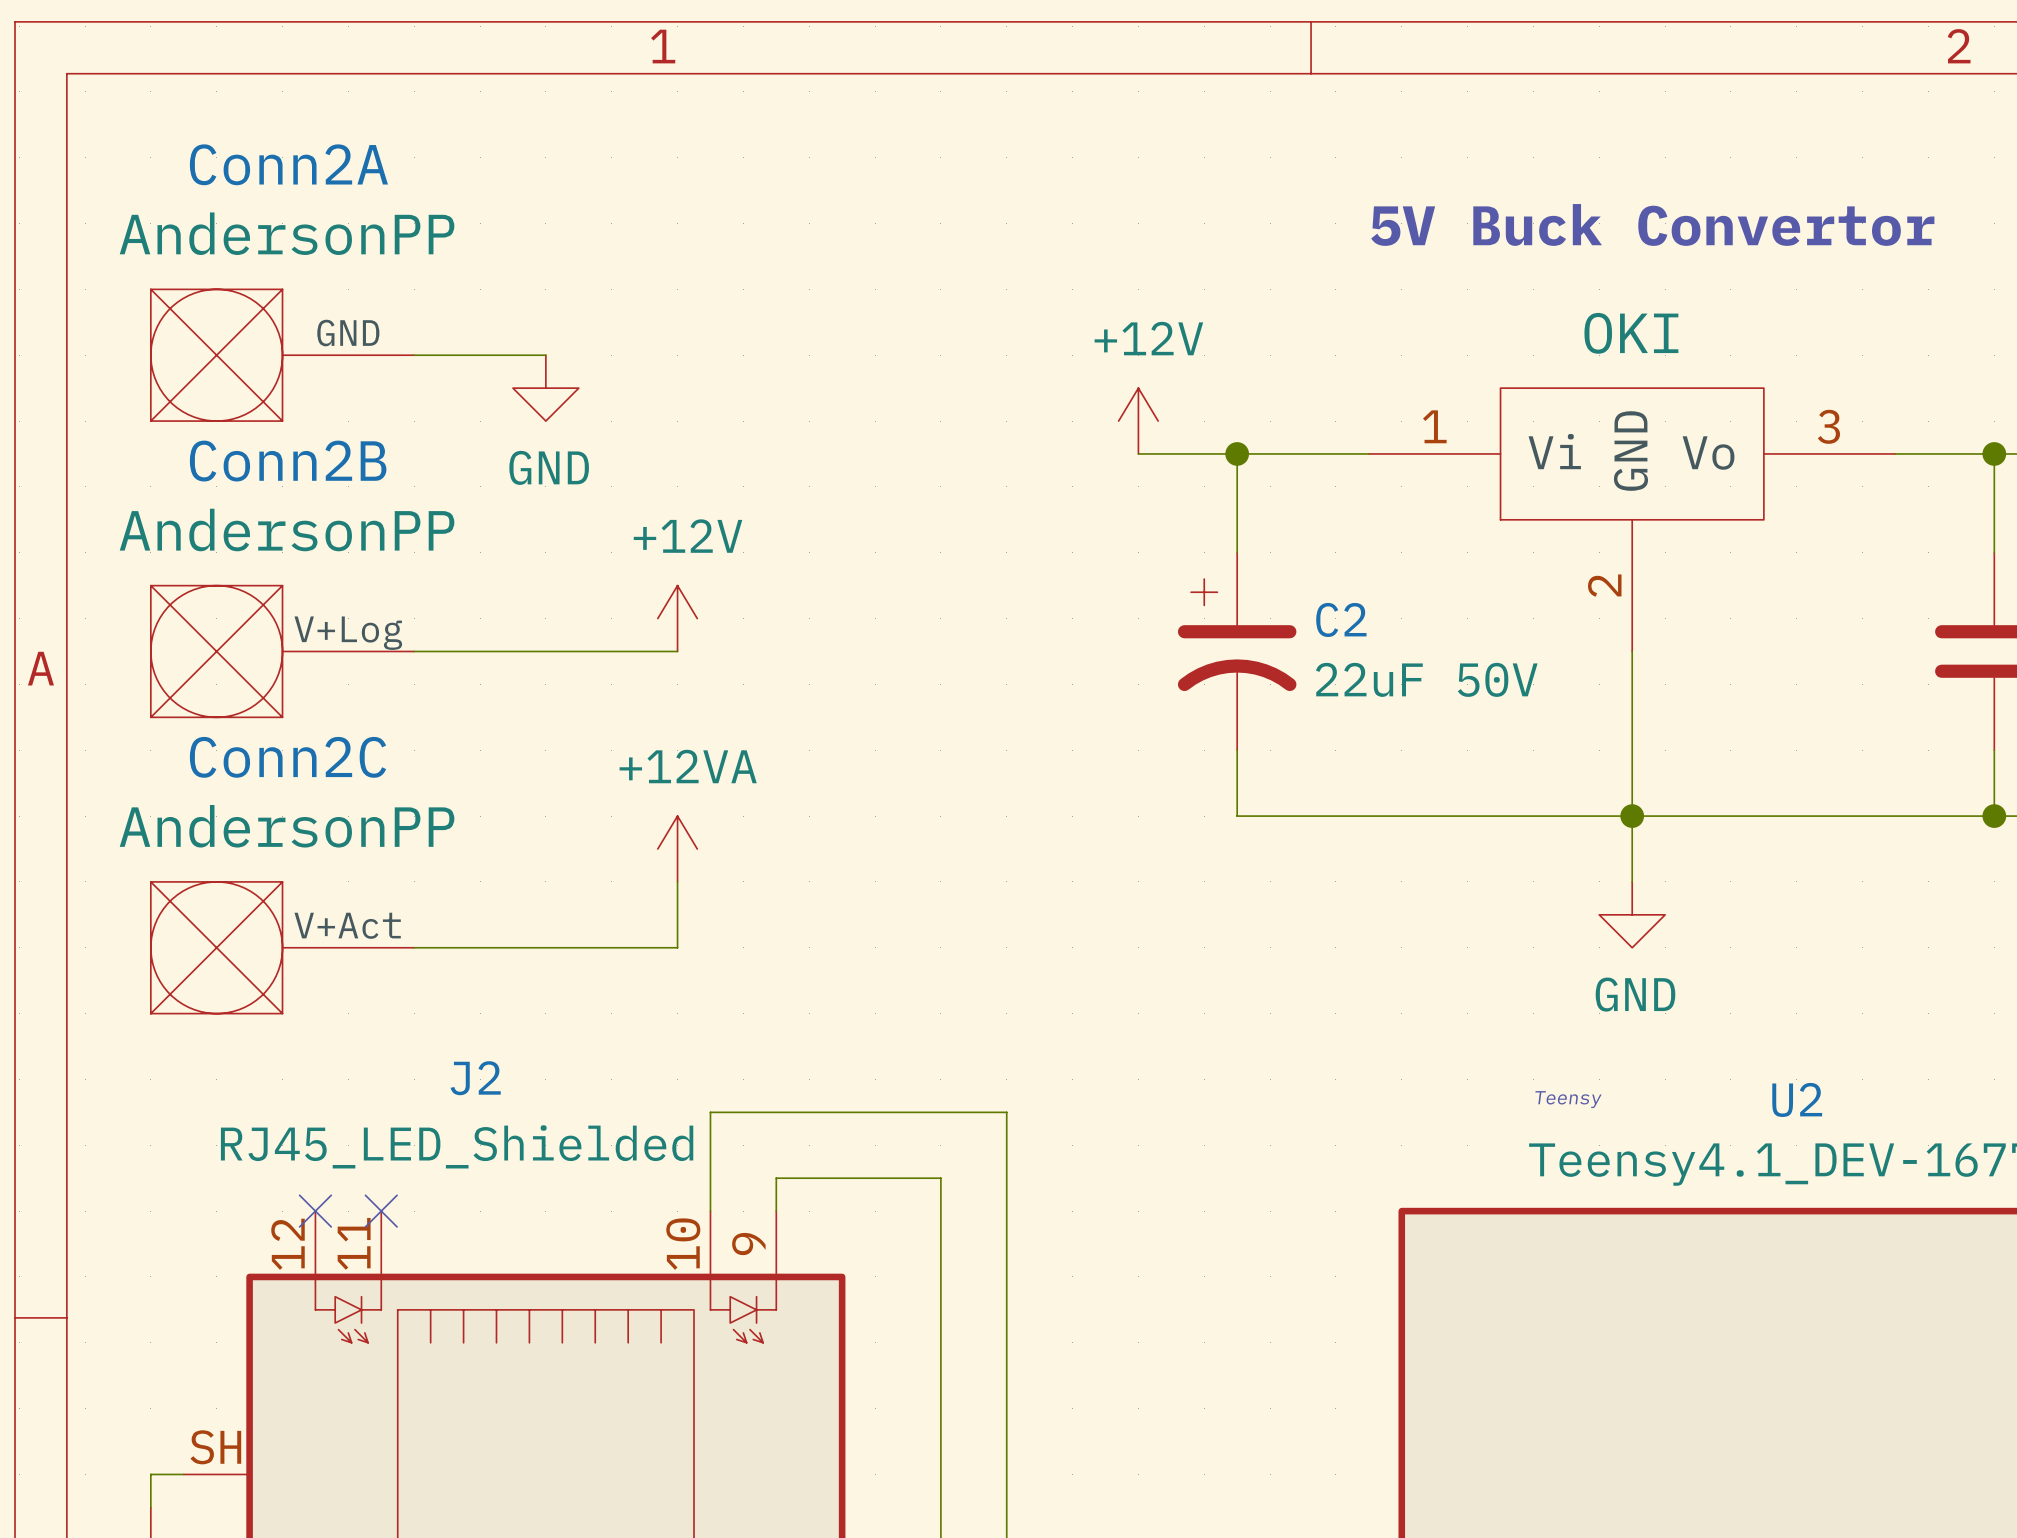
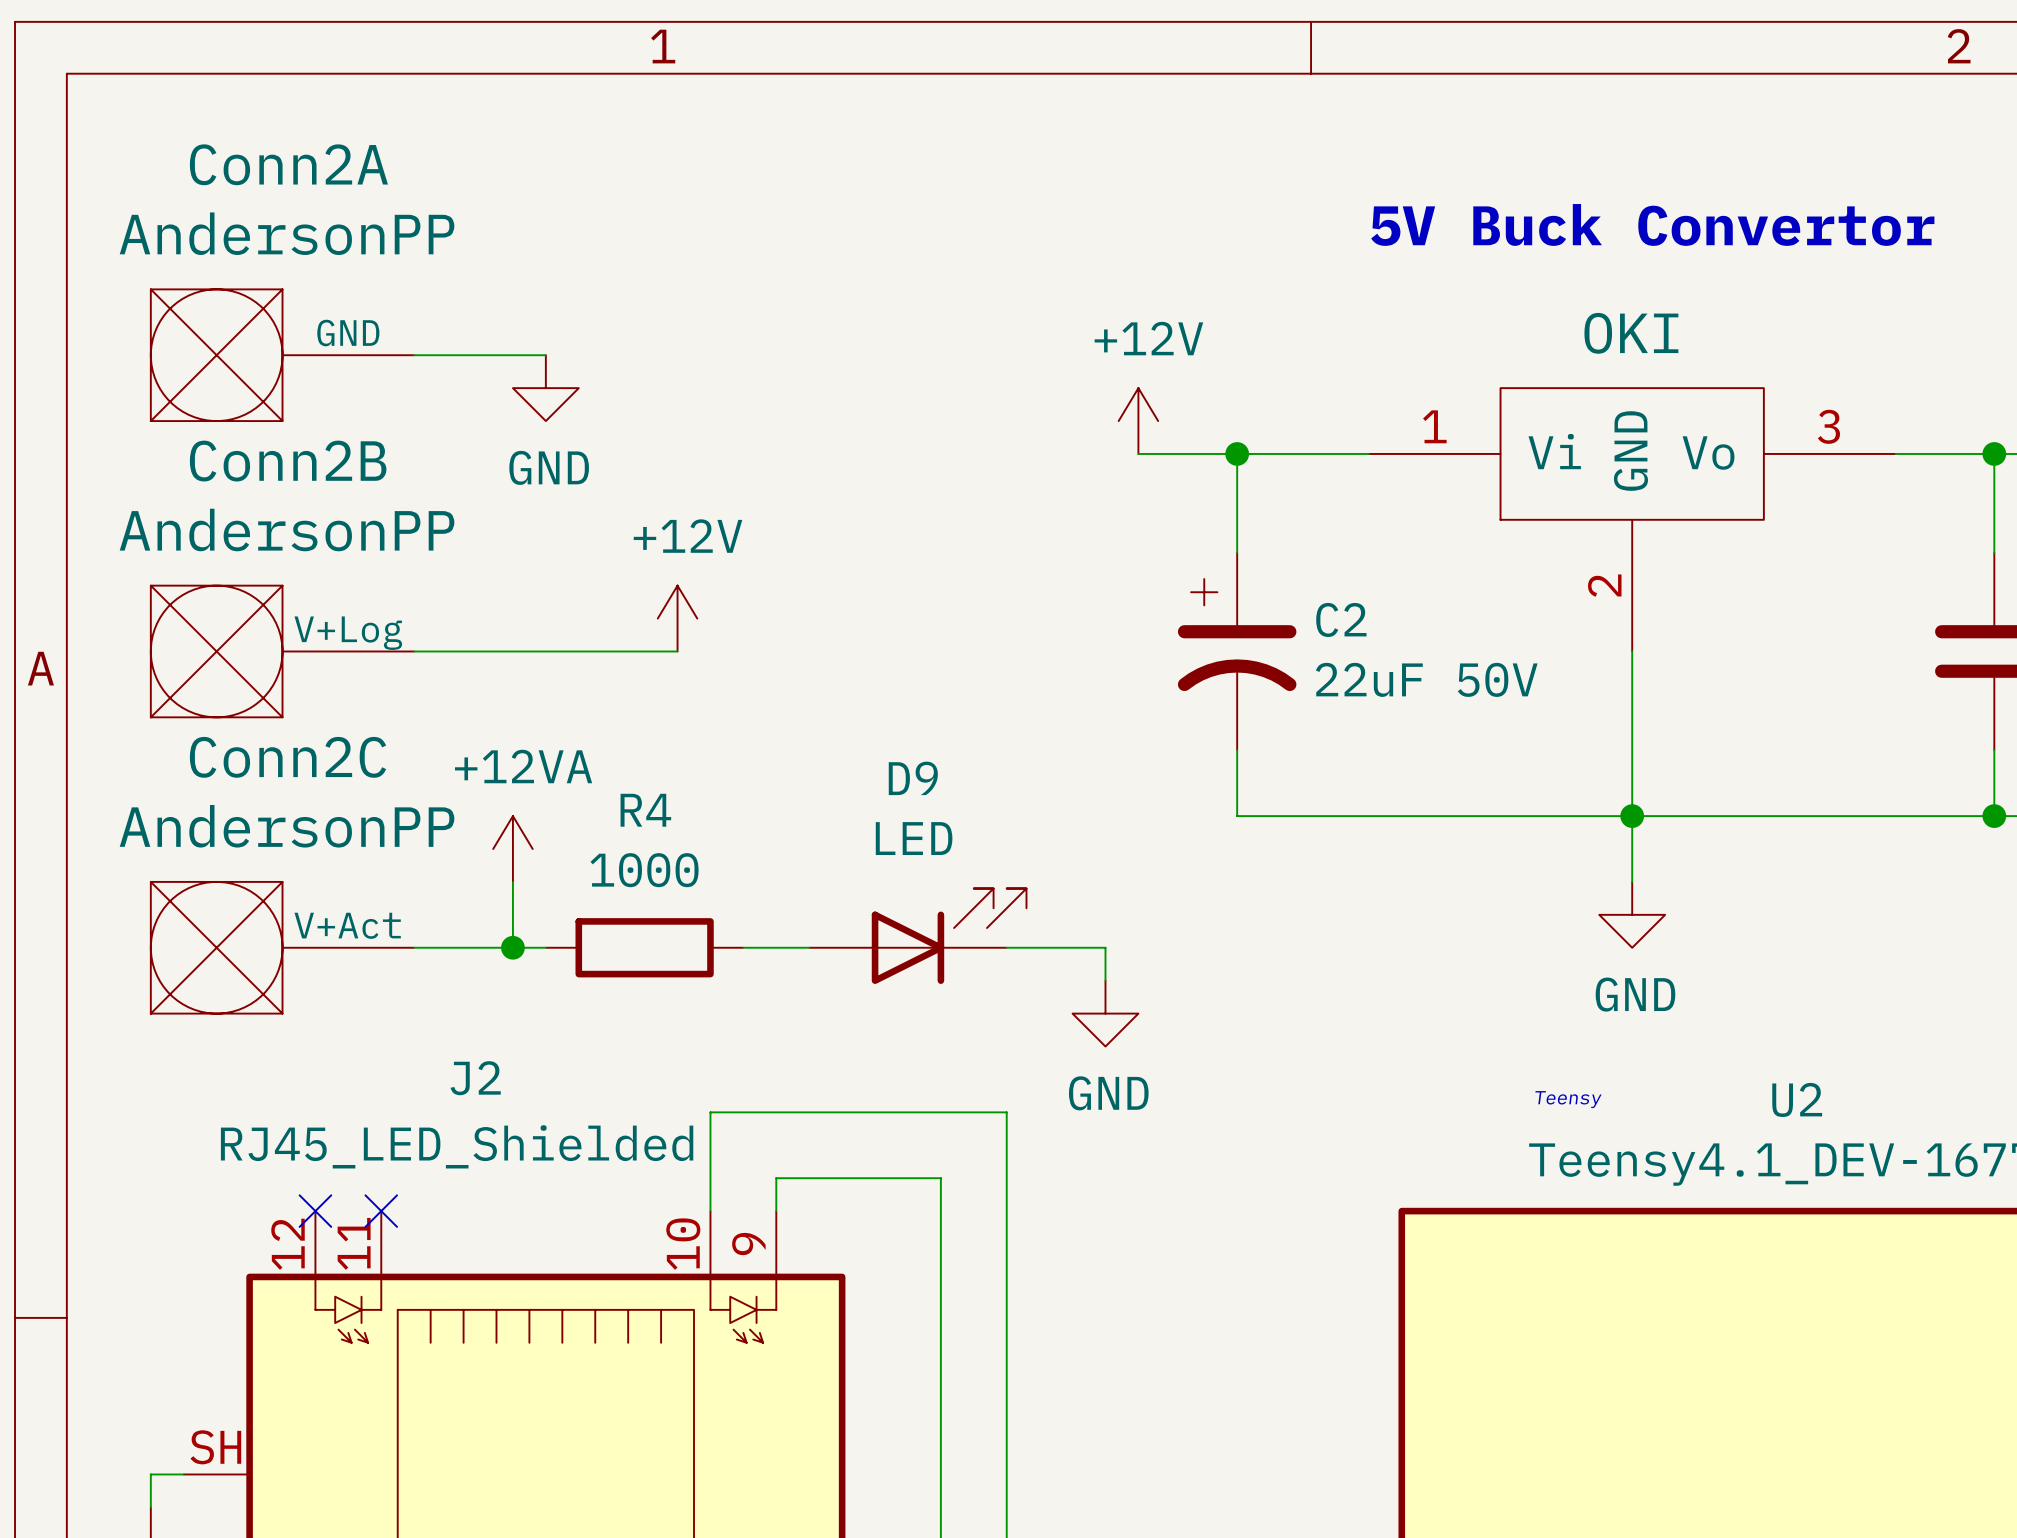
power symbol position: +12VA (677, 849) -> +12VA (512, 849)
wire: none -> (512, 881) (512, 947)
wire: (677, 881) (677, 947) (545, 947) -> none
D9: none -> LED (917, 936)
junction: none -> (512, 947)
R4: none -> 1000 (644, 947)
wire: none -> (743, 947) (809, 947)
wire: none -> (1006, 947) (1105, 947) (1105, 980)
power symbol: none -> GND (1105, 1013)

